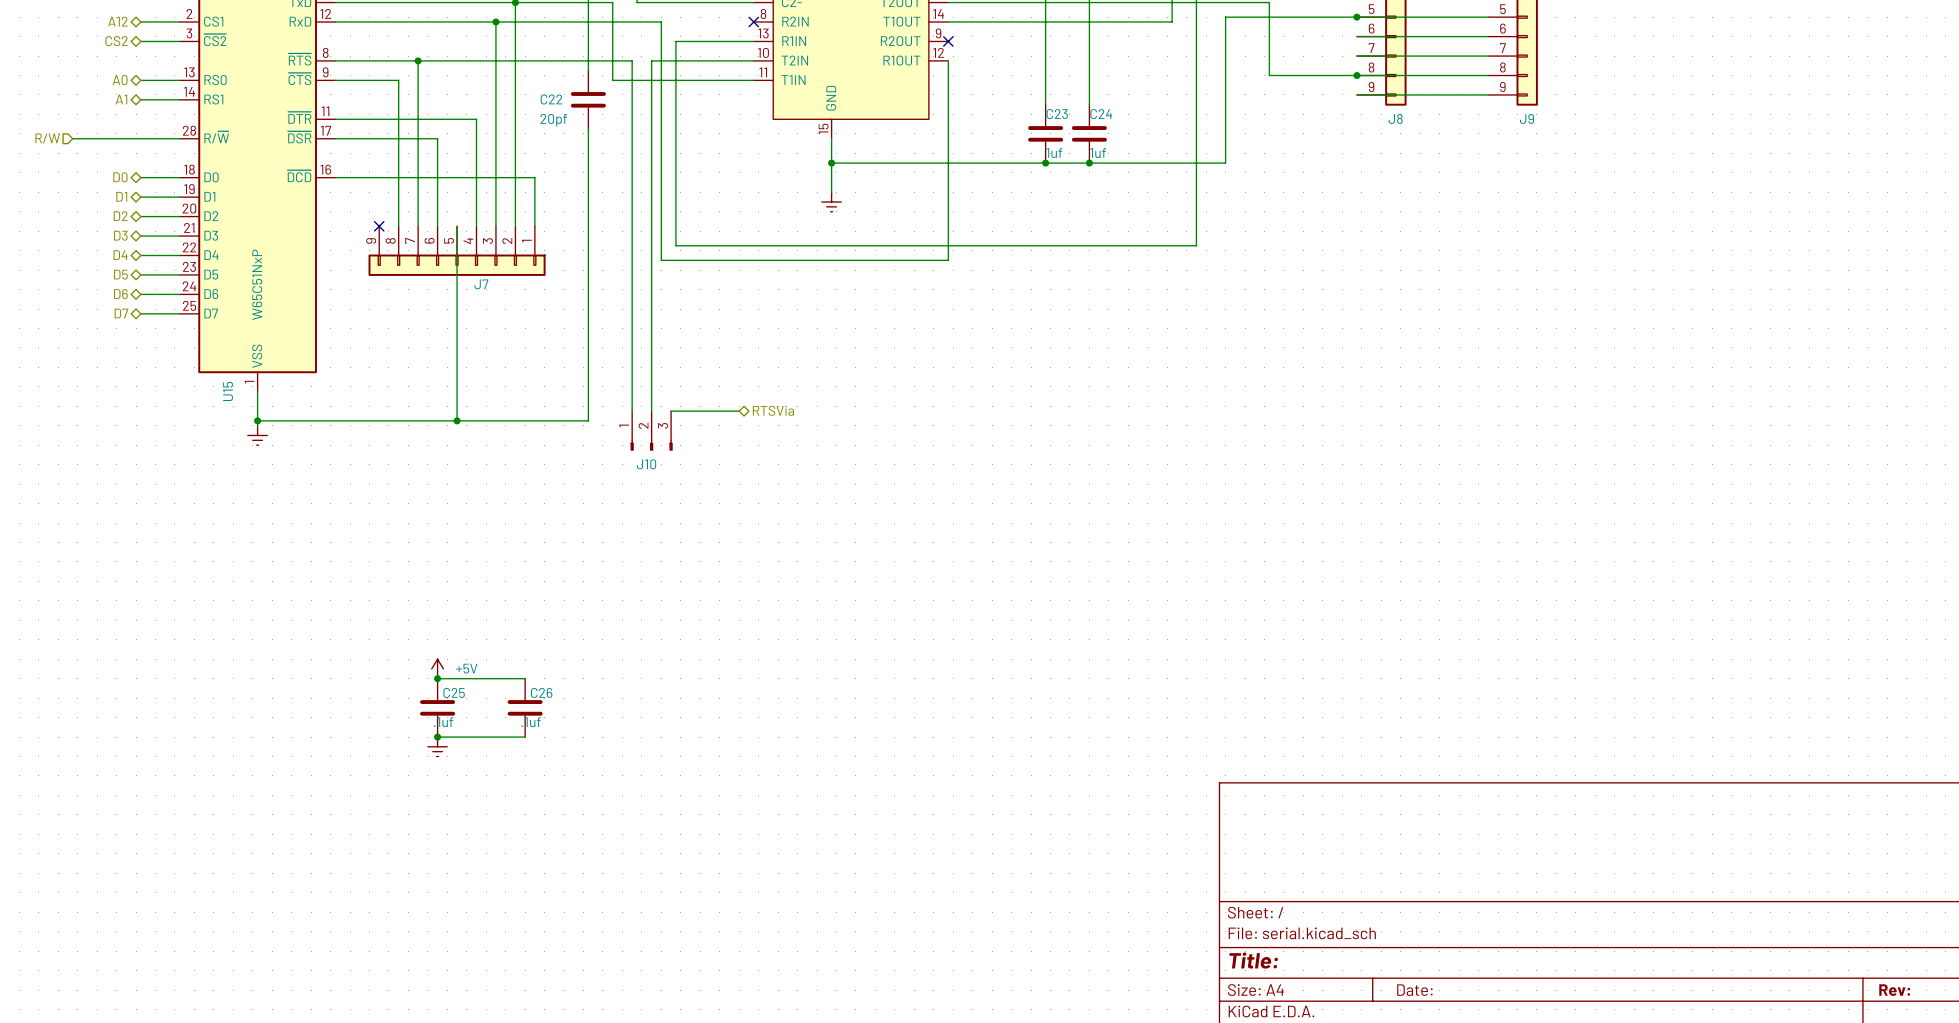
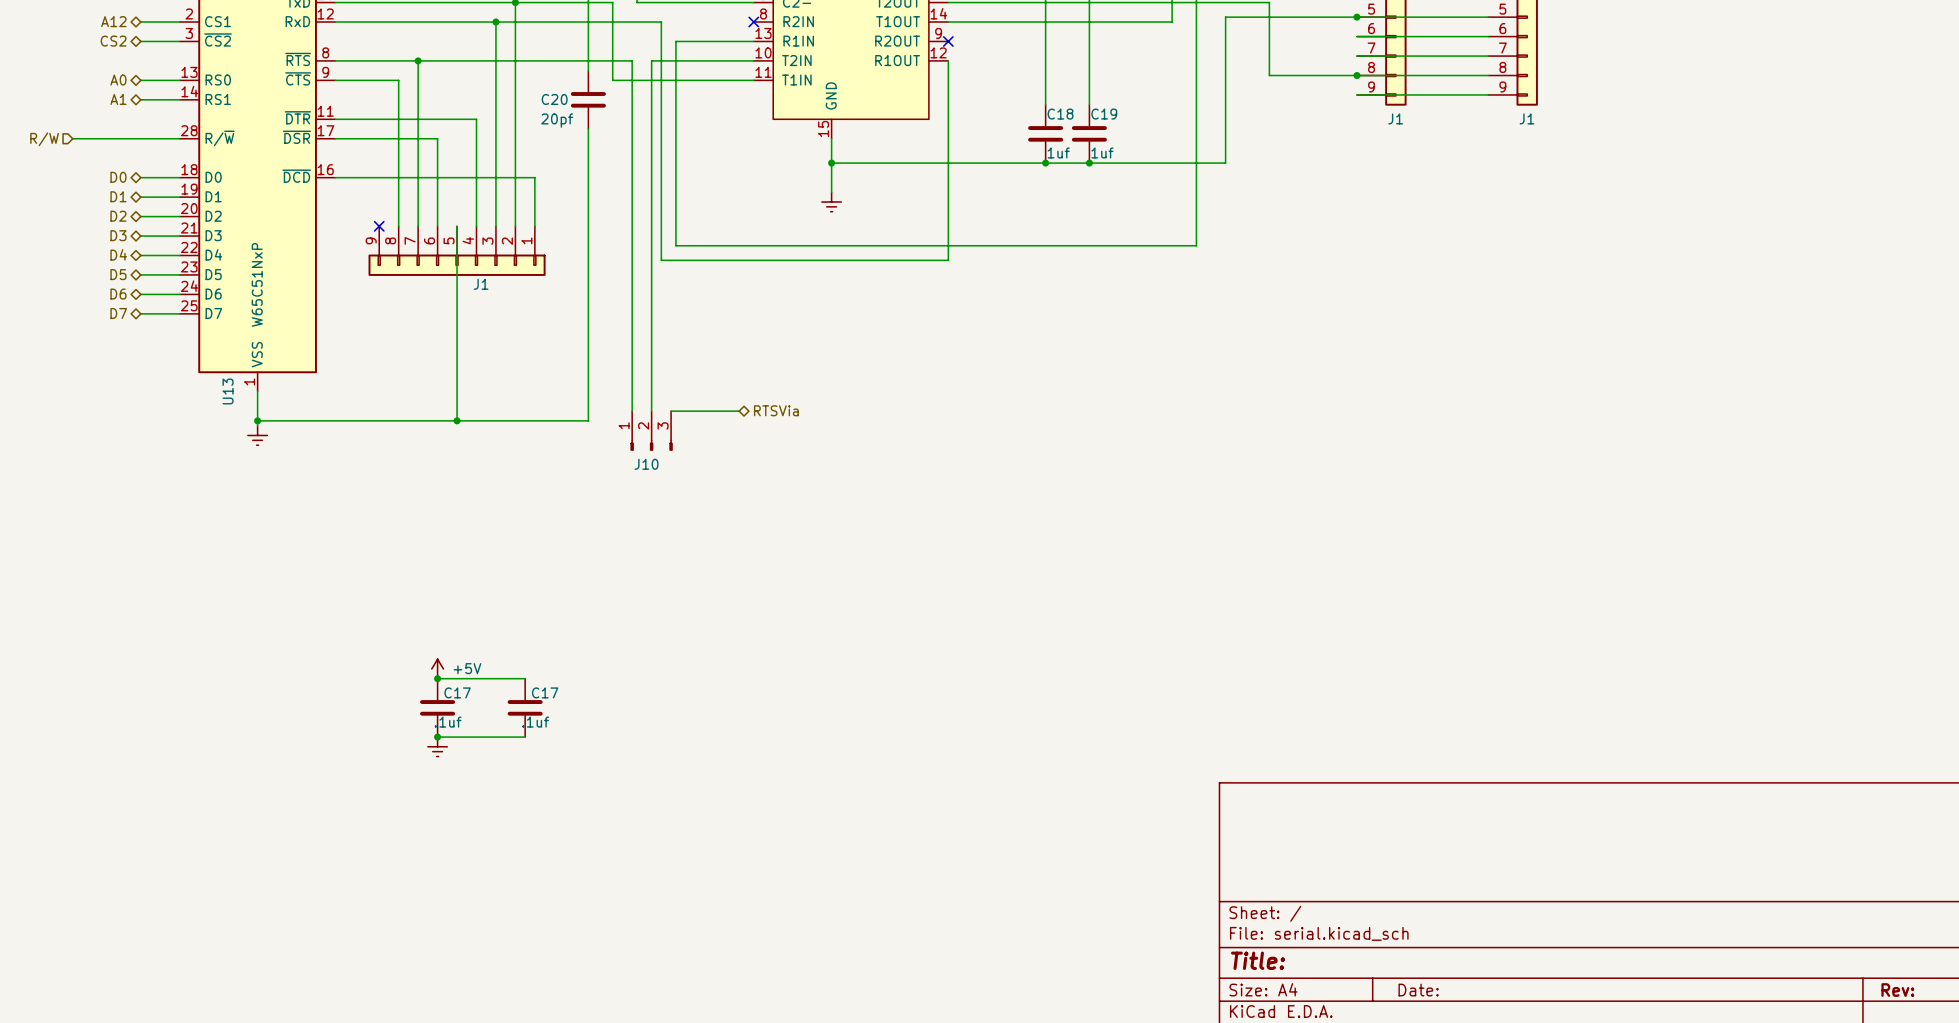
C22 name: C22 (551, 99) -> C20 (554, 99)
C23 name: C23 (1057, 114) -> C18 (1060, 114)
C24 name: C24 (1101, 114) -> C19 (1104, 114)
J8 name: J8 (1395, 118) -> J1 (1395, 118)
J9 name: J9 (1526, 118) -> J1 (1526, 118)
J7 name: J7 (481, 284) -> J1 (481, 284)
U15 name: U15 (228, 391) -> U13 (228, 391)
C25 name: C25 (454, 692) -> C17 (457, 692)
C26 name: C26 (541, 692) -> C17 (545, 692)

